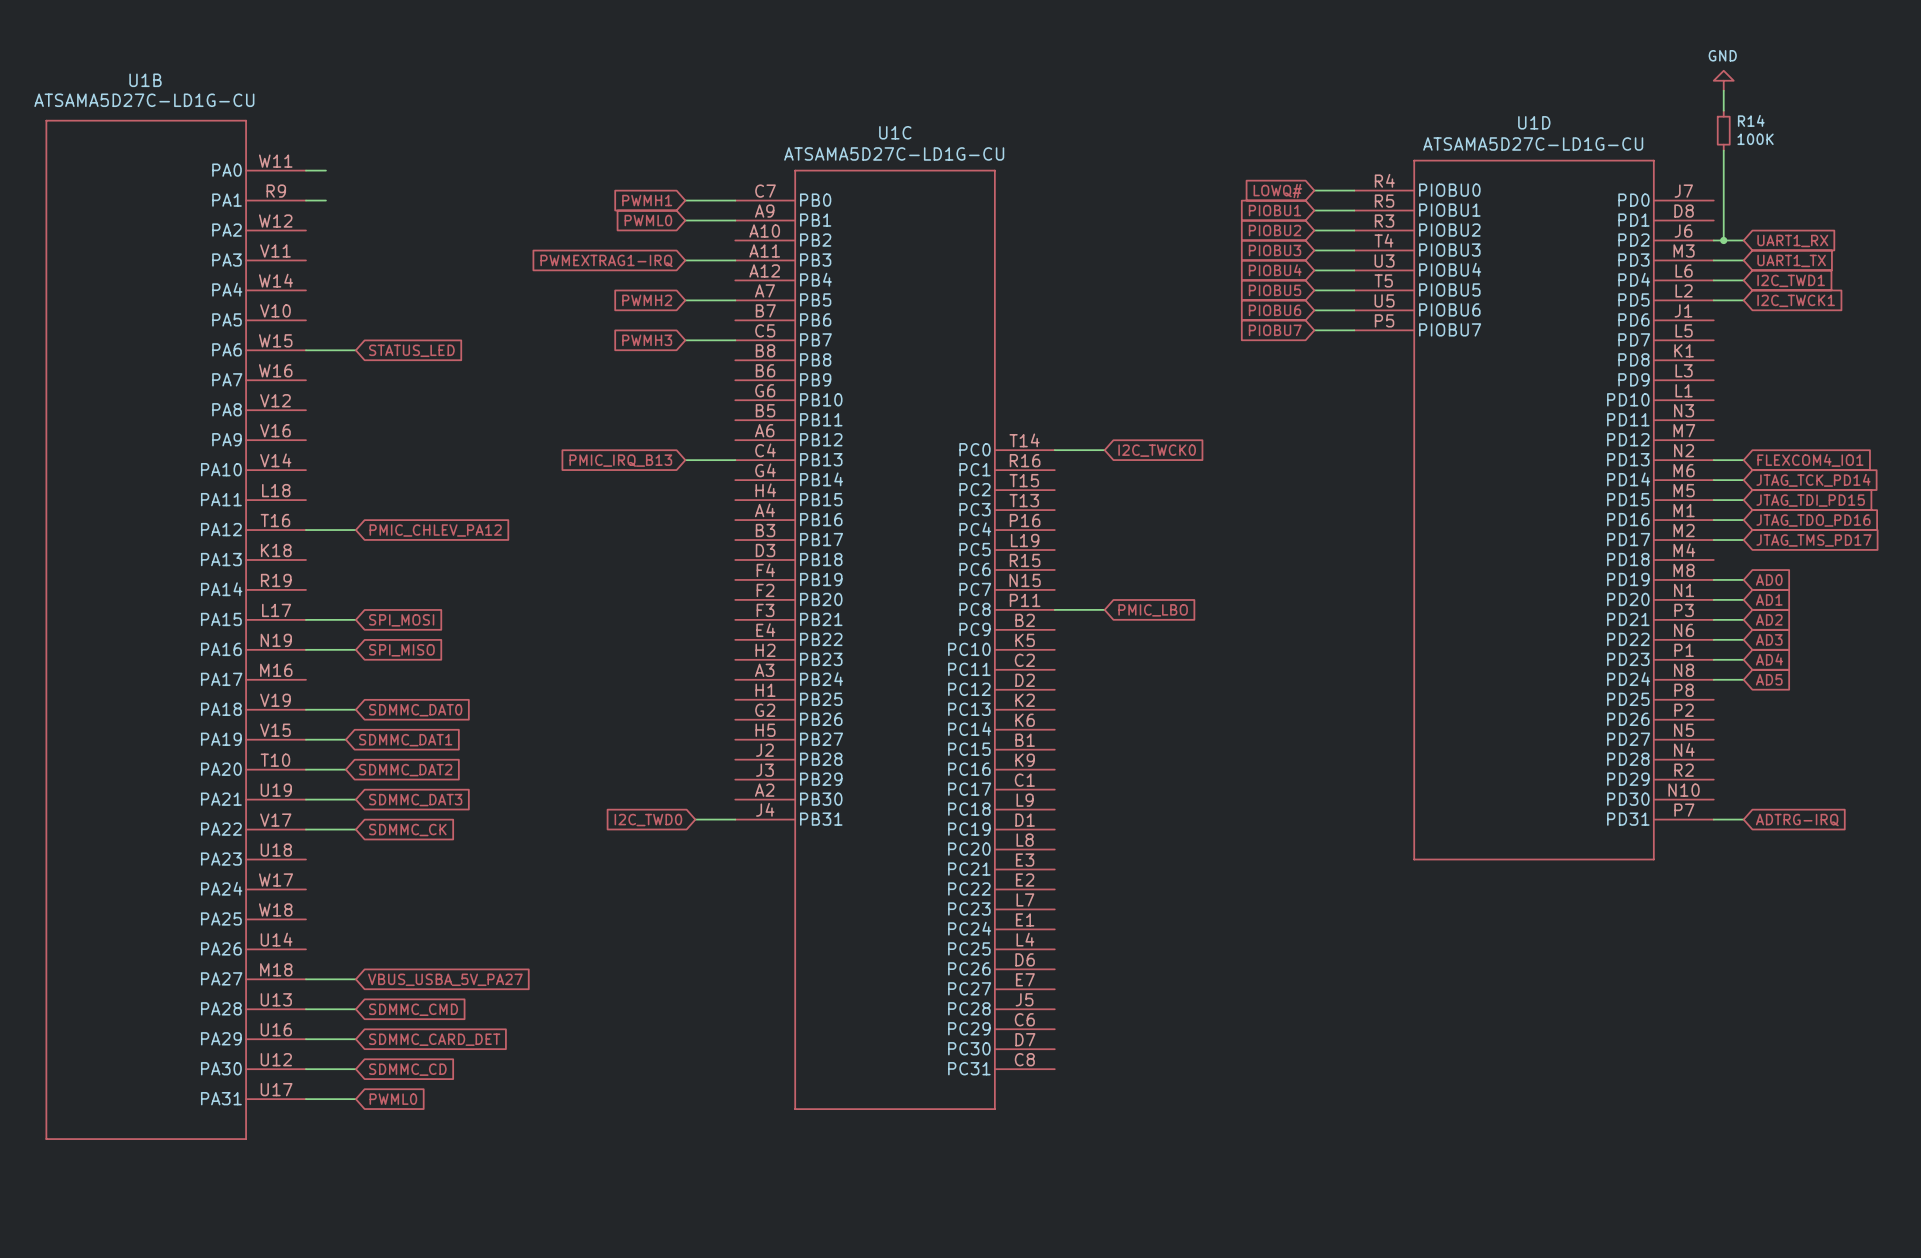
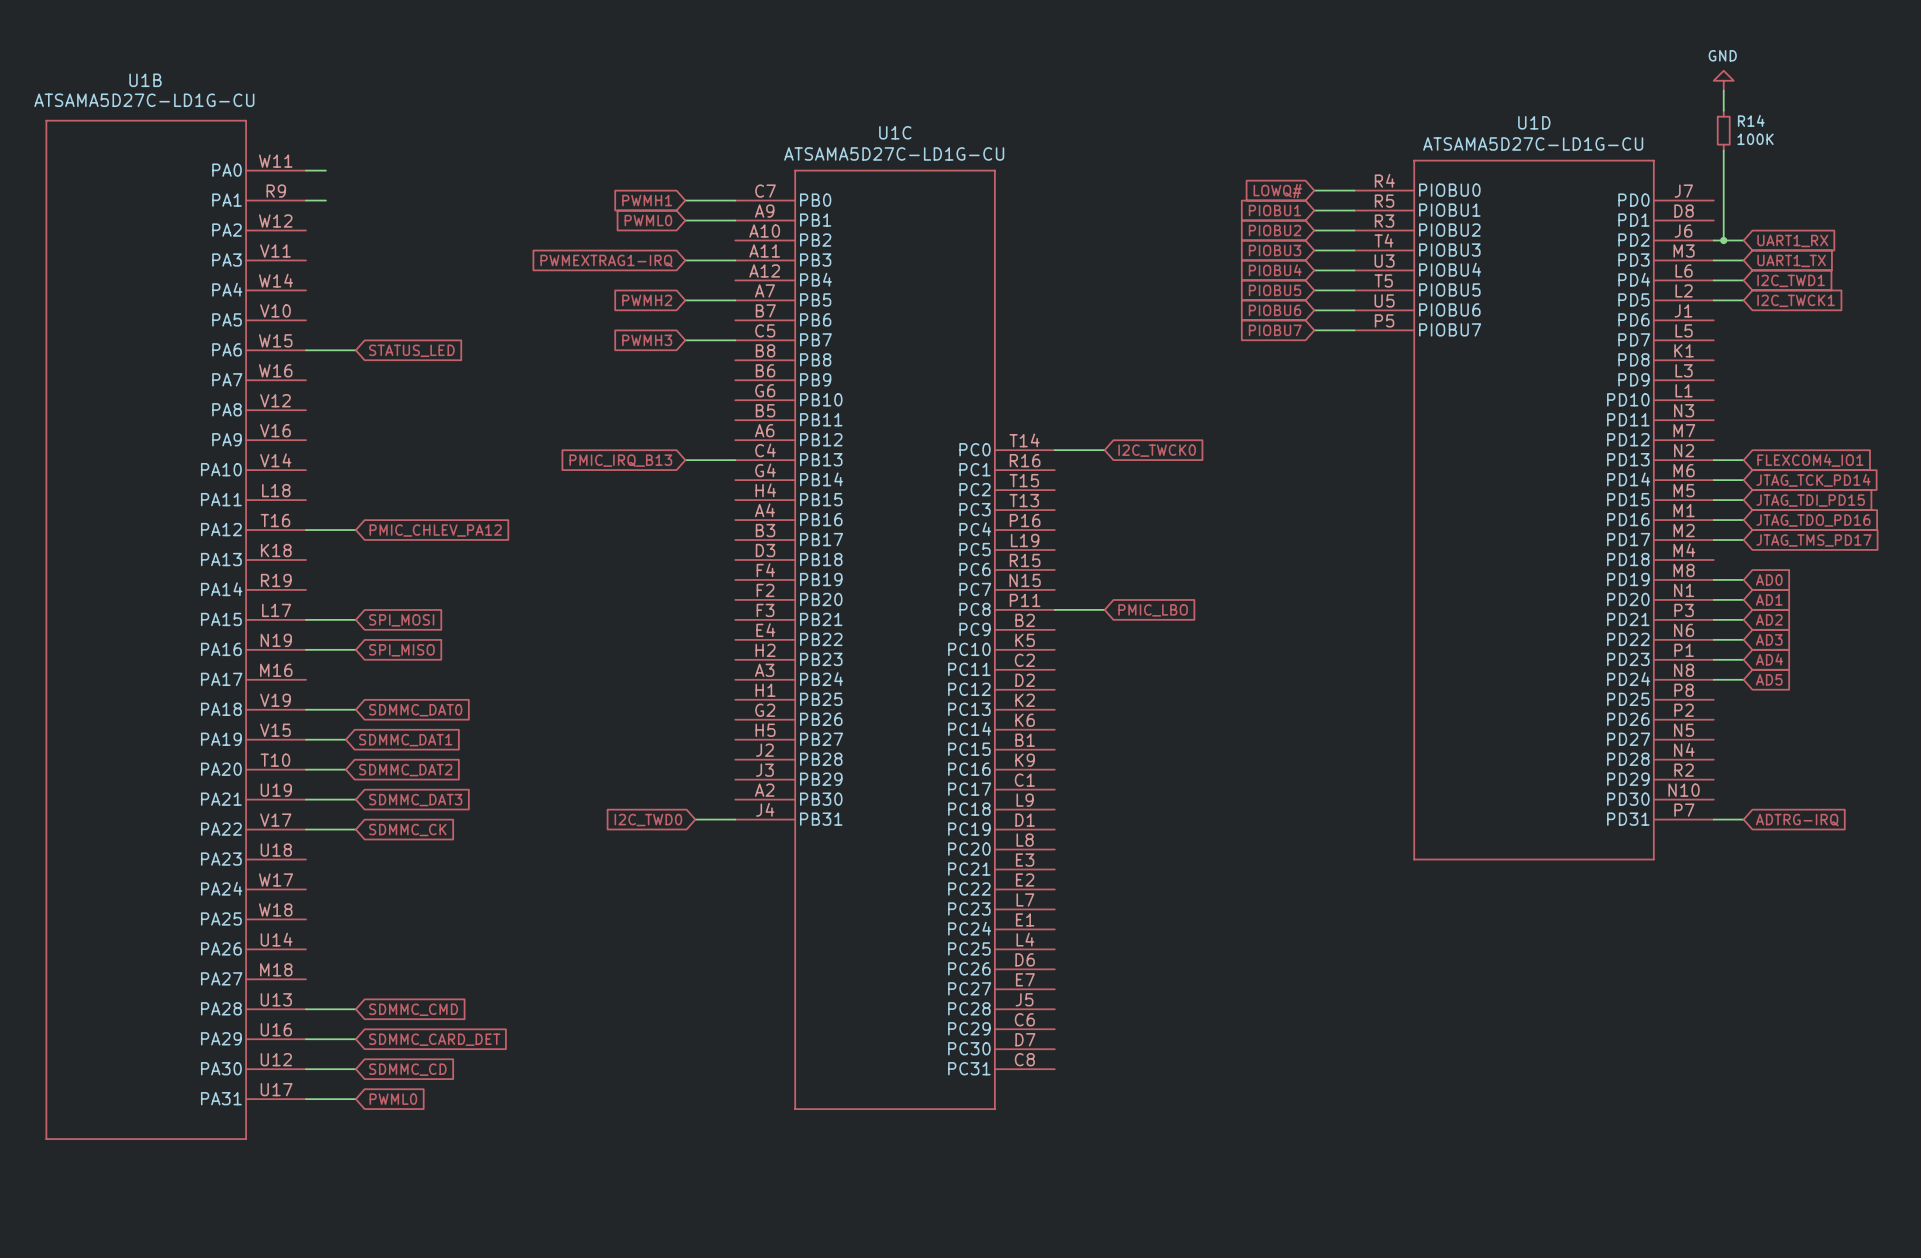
wire: (305, 979) (355, 979) -> none
global label: VBUS_USBA_5V_PA27 (445, 979) -> none

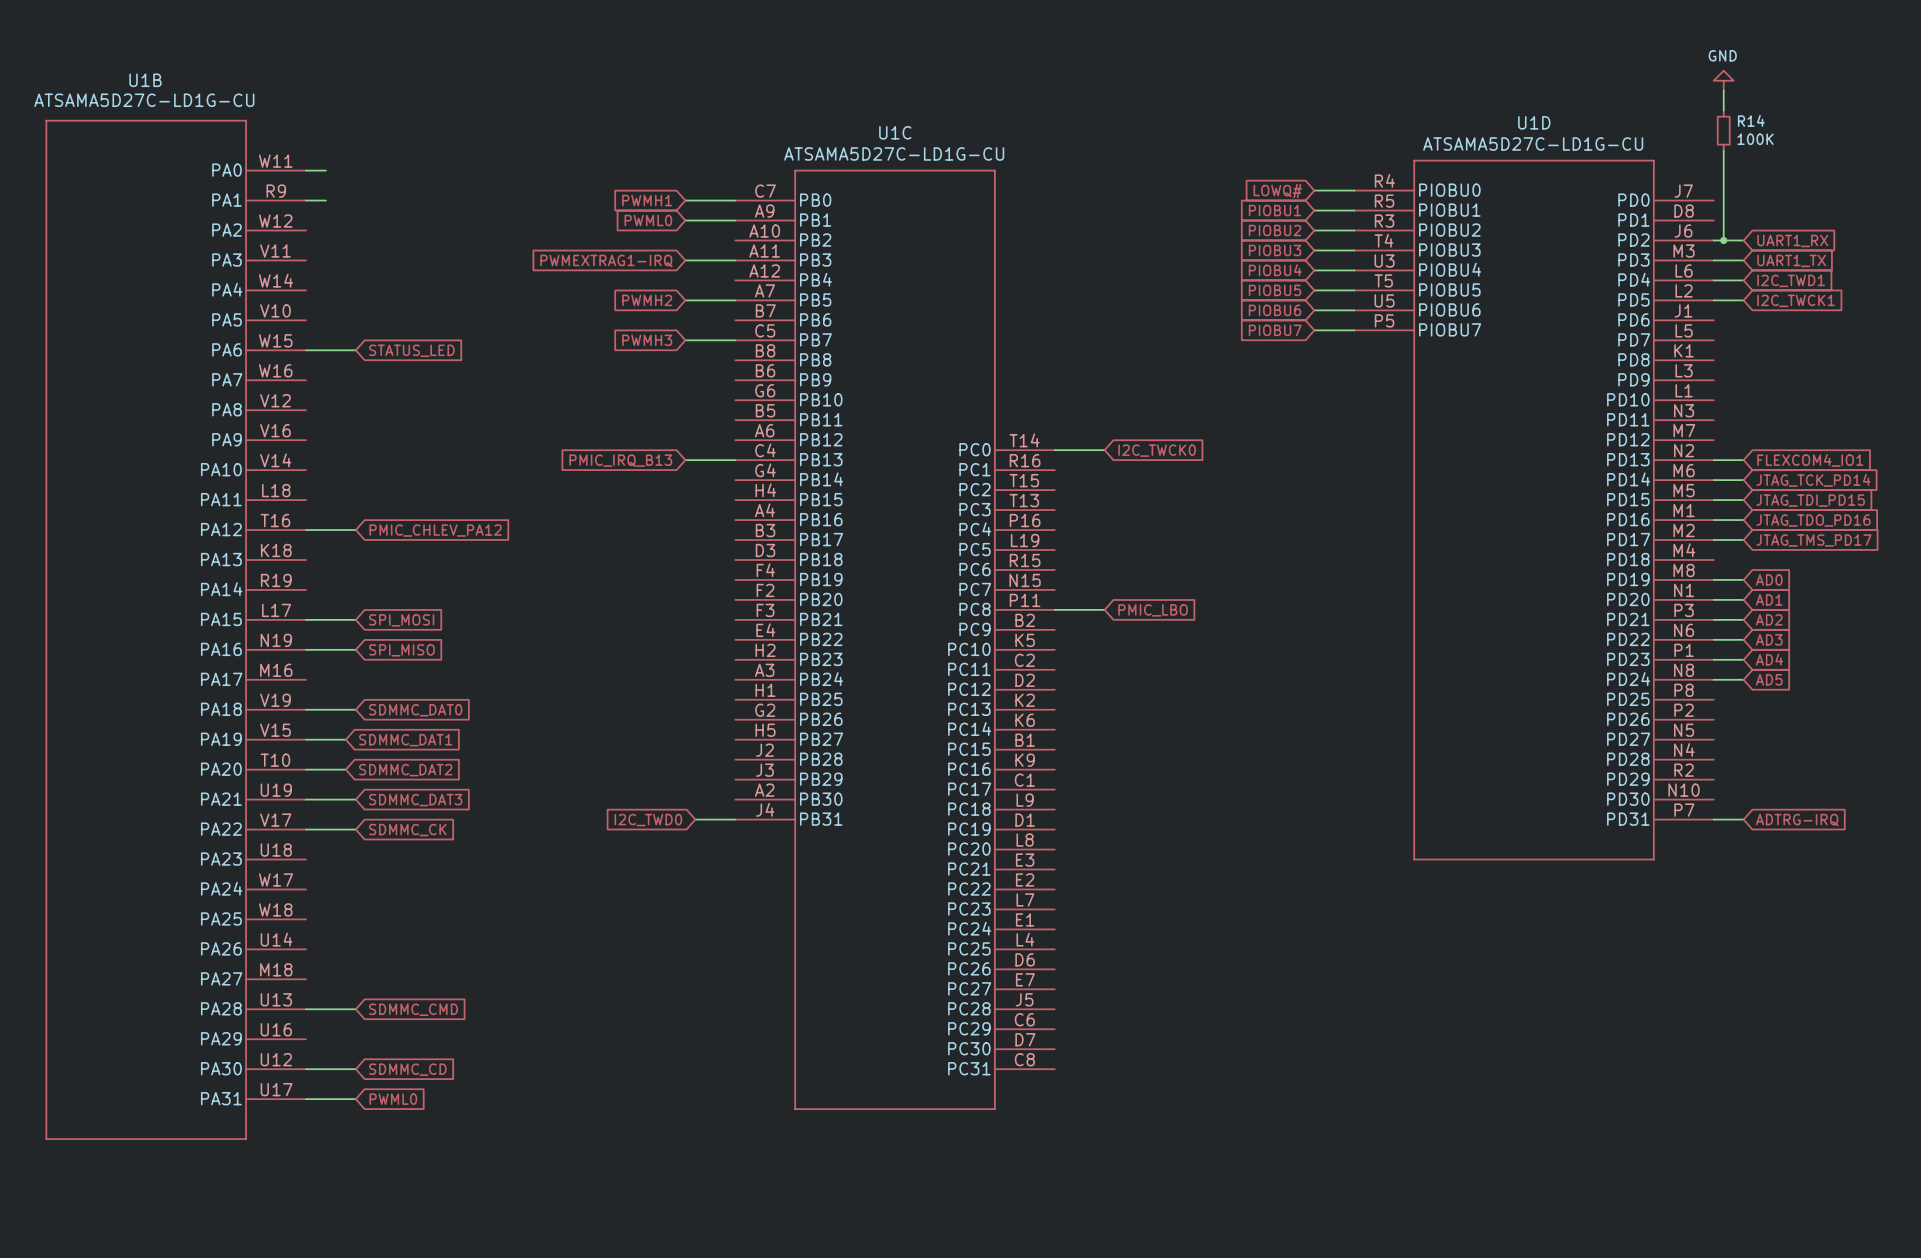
wire: (305, 1039) (355, 1039) -> none
global label: SDMMC_CARD_DET (434, 1039) -> none

